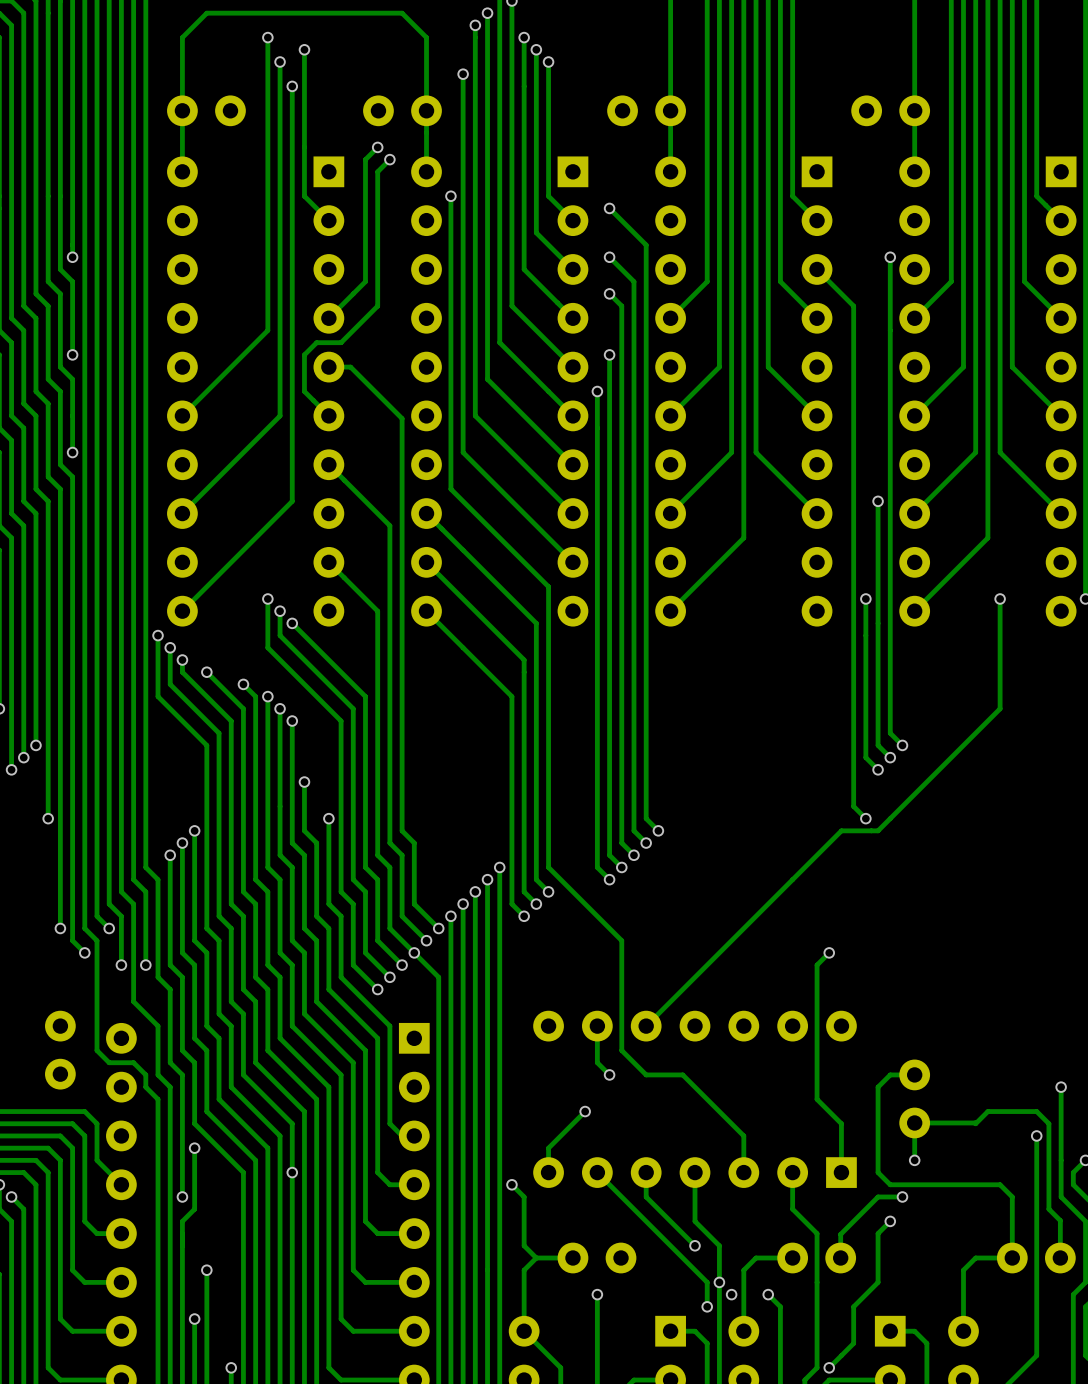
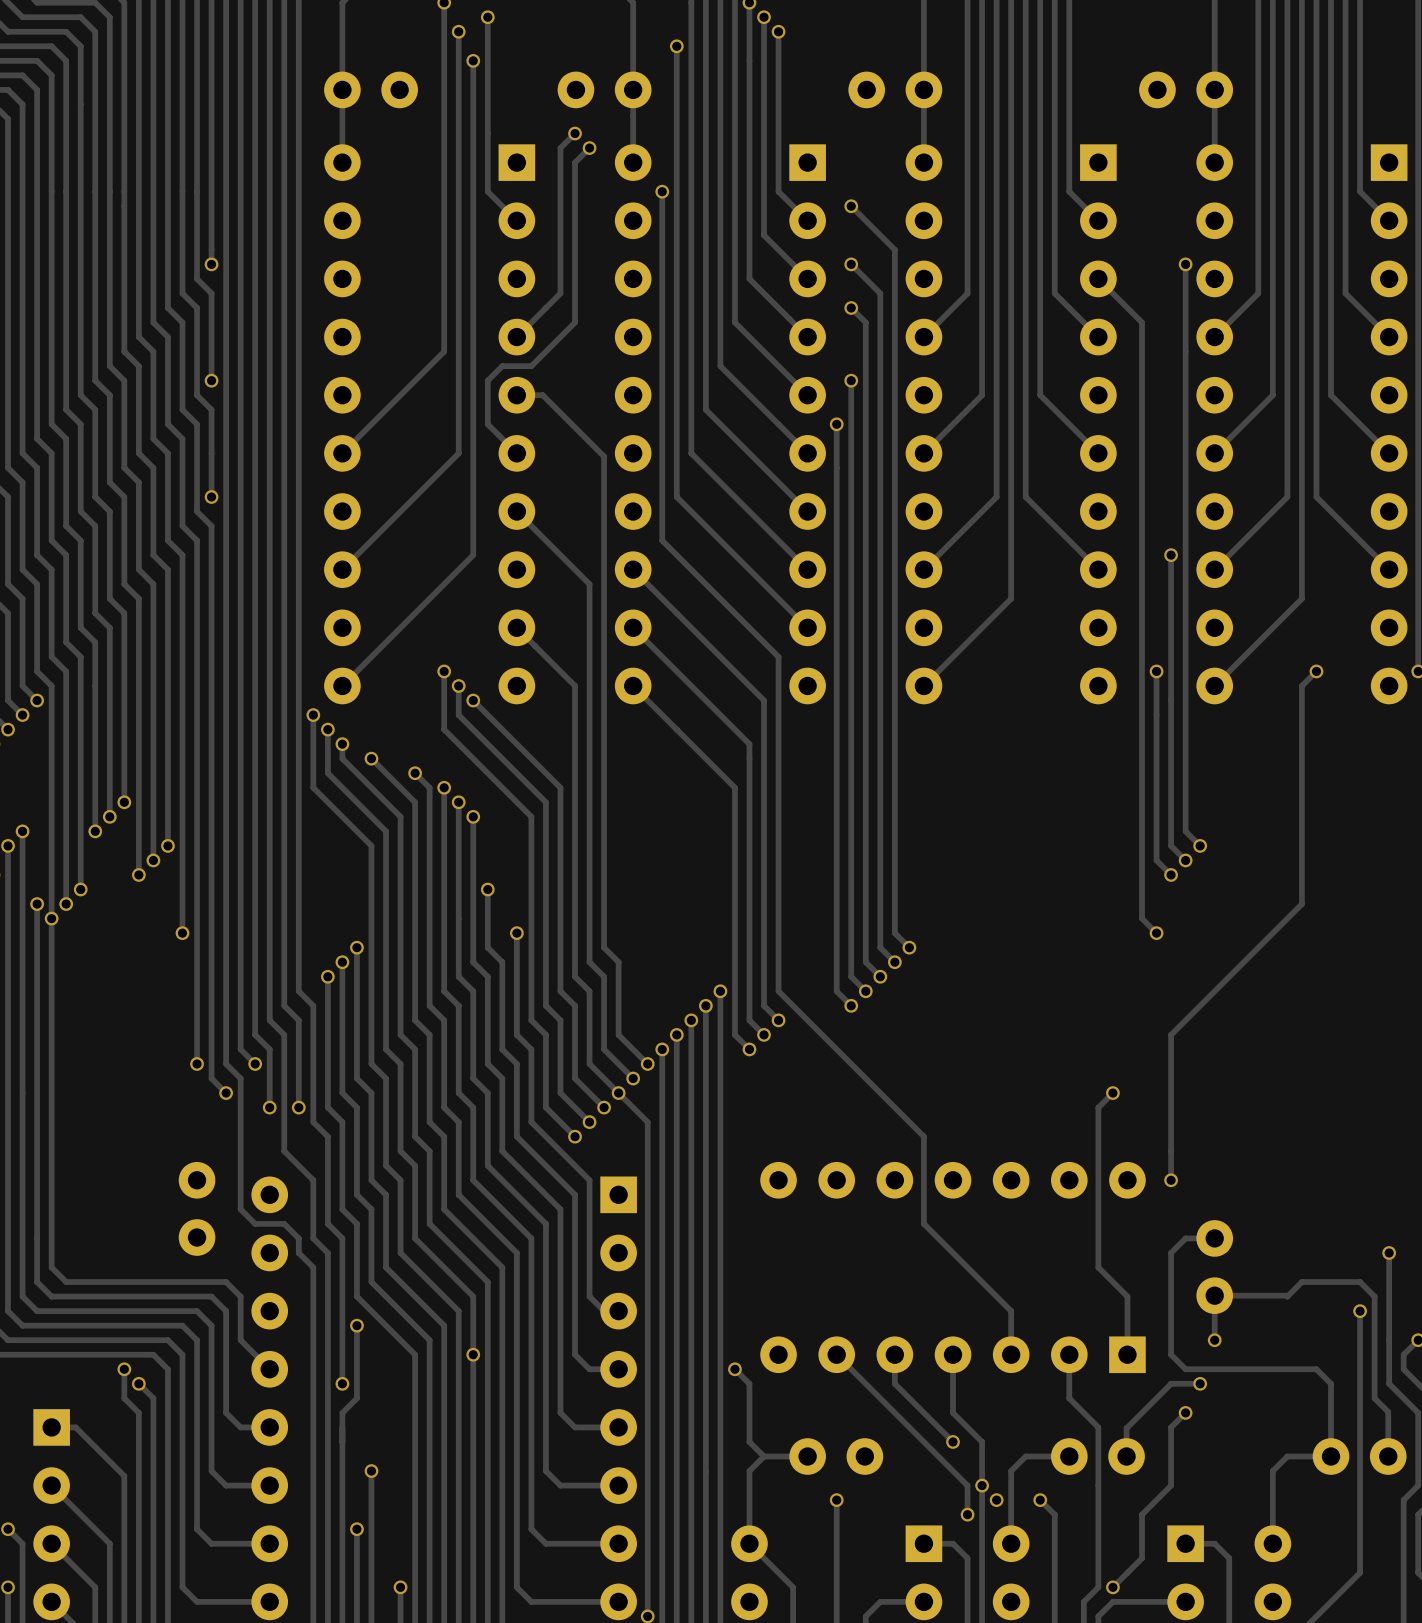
track: (1000, 598) (1000, 708) (878, 830) (841, 830) (646, 1026) -> (1316, 671) (1301, 685) (1301, 904) (1171, 1034) (1171, 1180)
track: (621, 940) (621, 1050) (646, 1074) (682, 1074) -> (865, 1078) (923, 1136) (923, 1223) (938, 1238)
track: (597, 1026) (597, 1062) (609, 1074) -> none
via: none -> (1171, 1180)
via: (609, 1074) -> none
track: (585, 1111) (548, 1148) (548, 1172) -> none
via: (585, 1111) -> none

